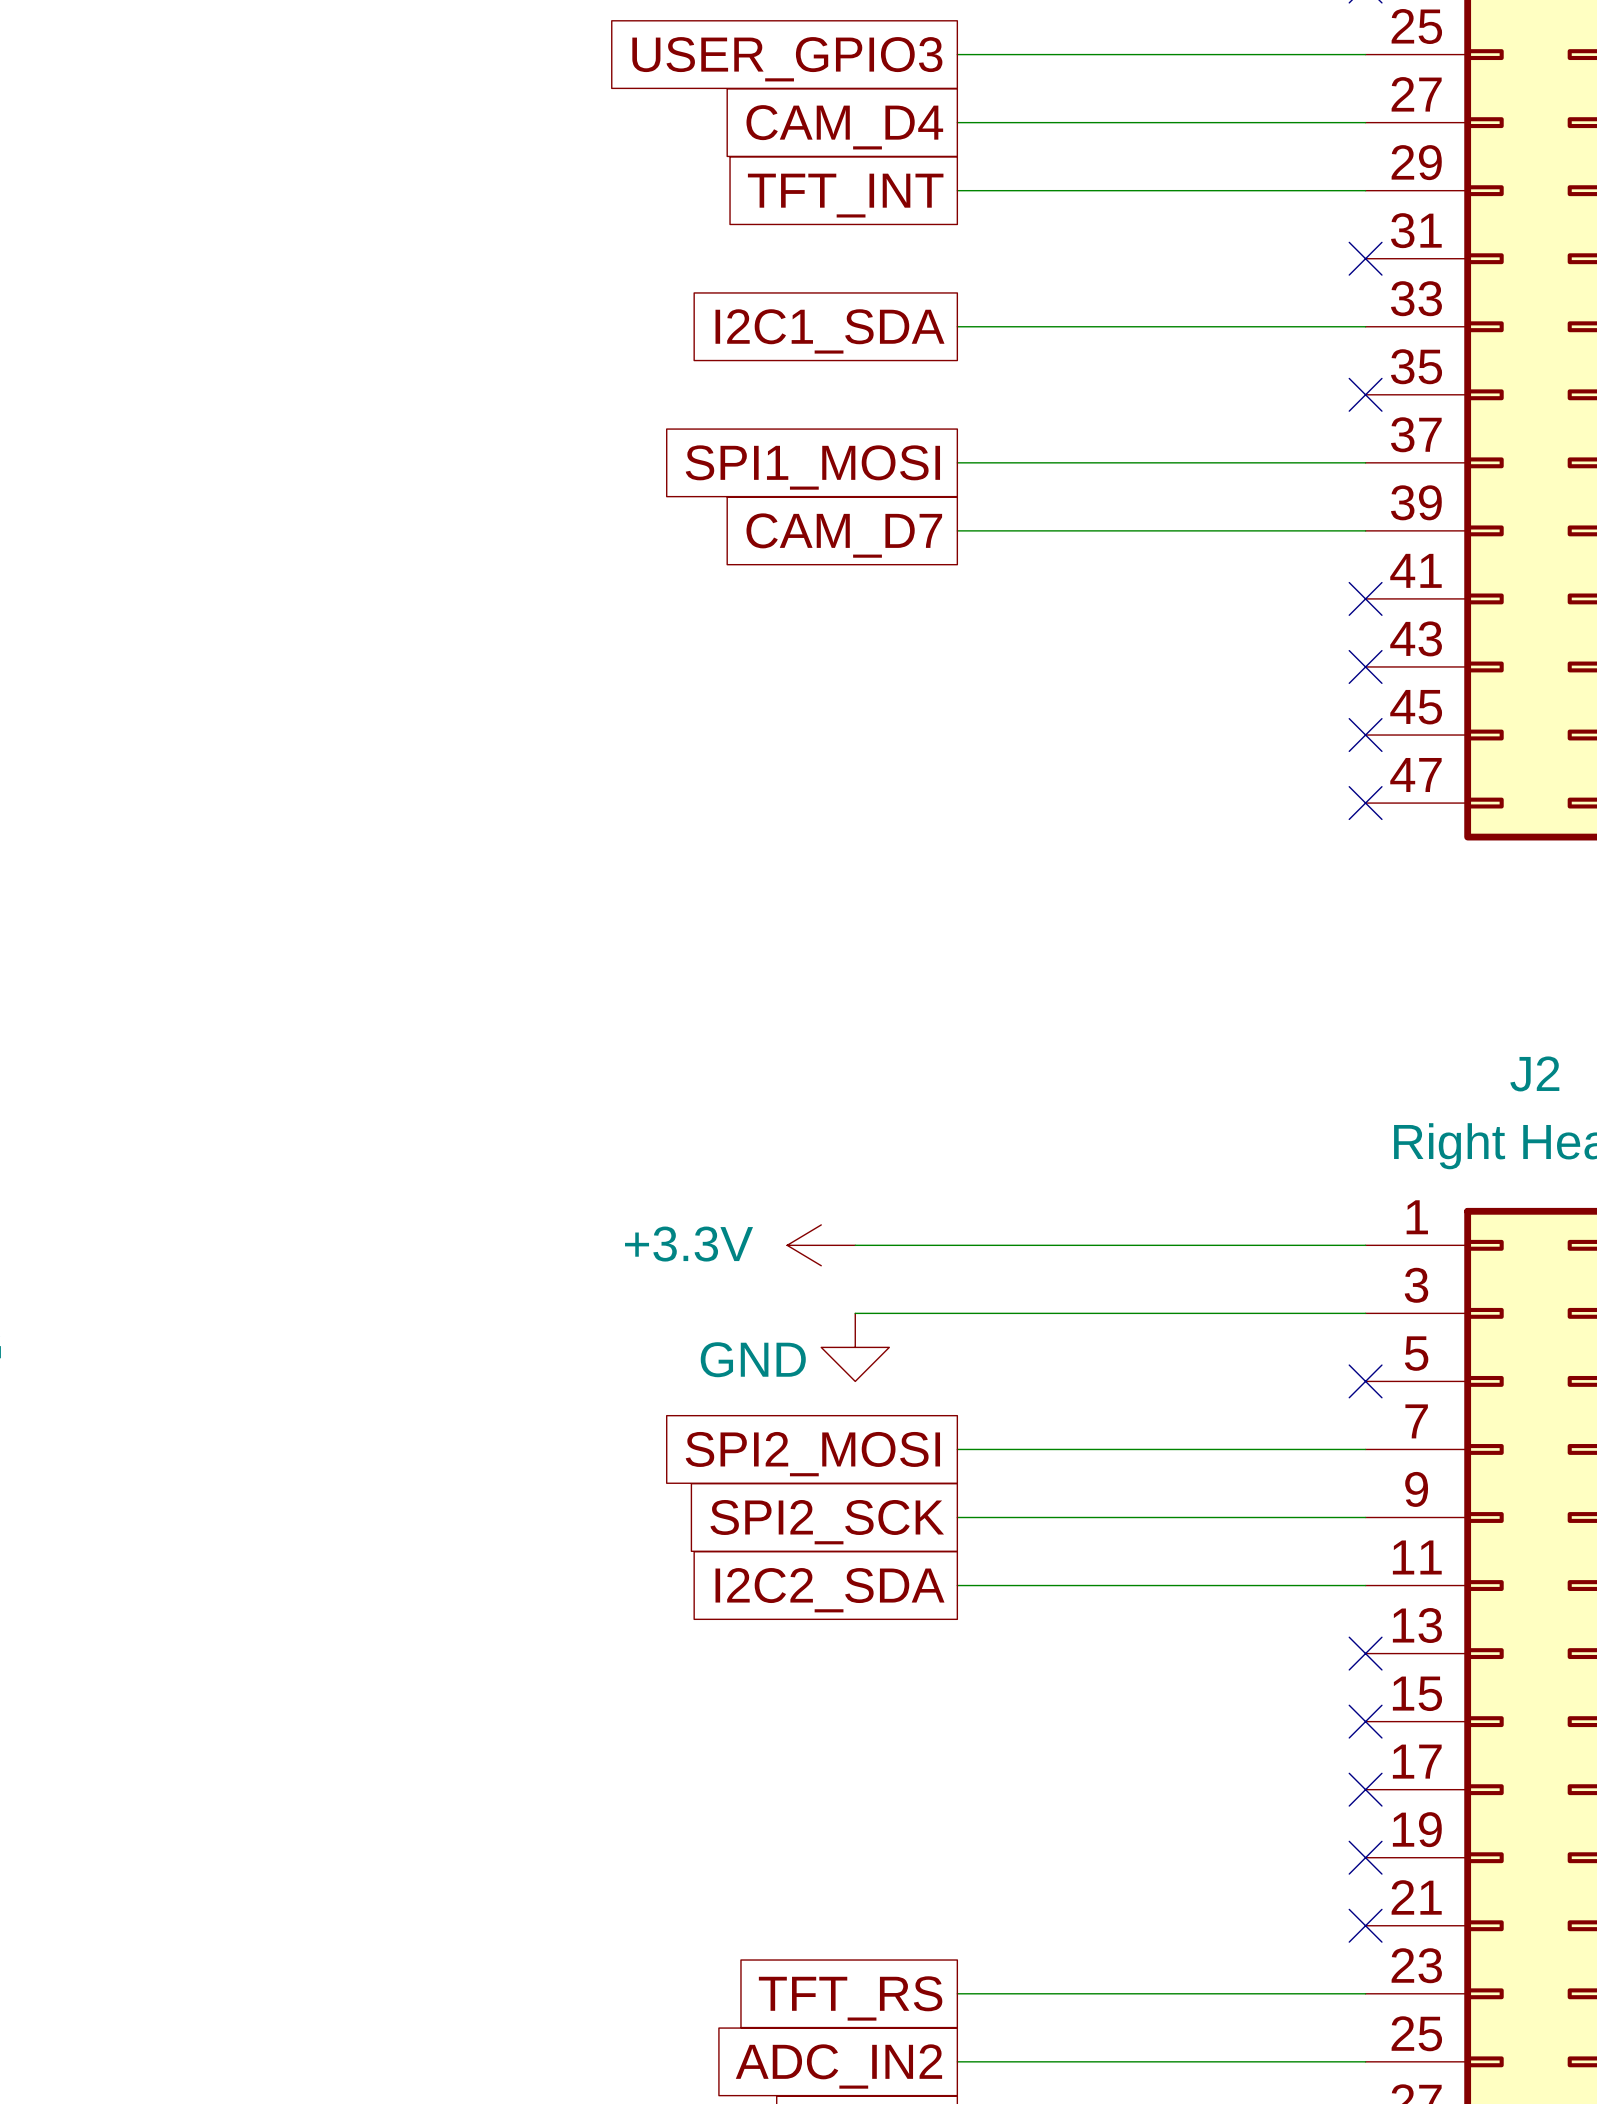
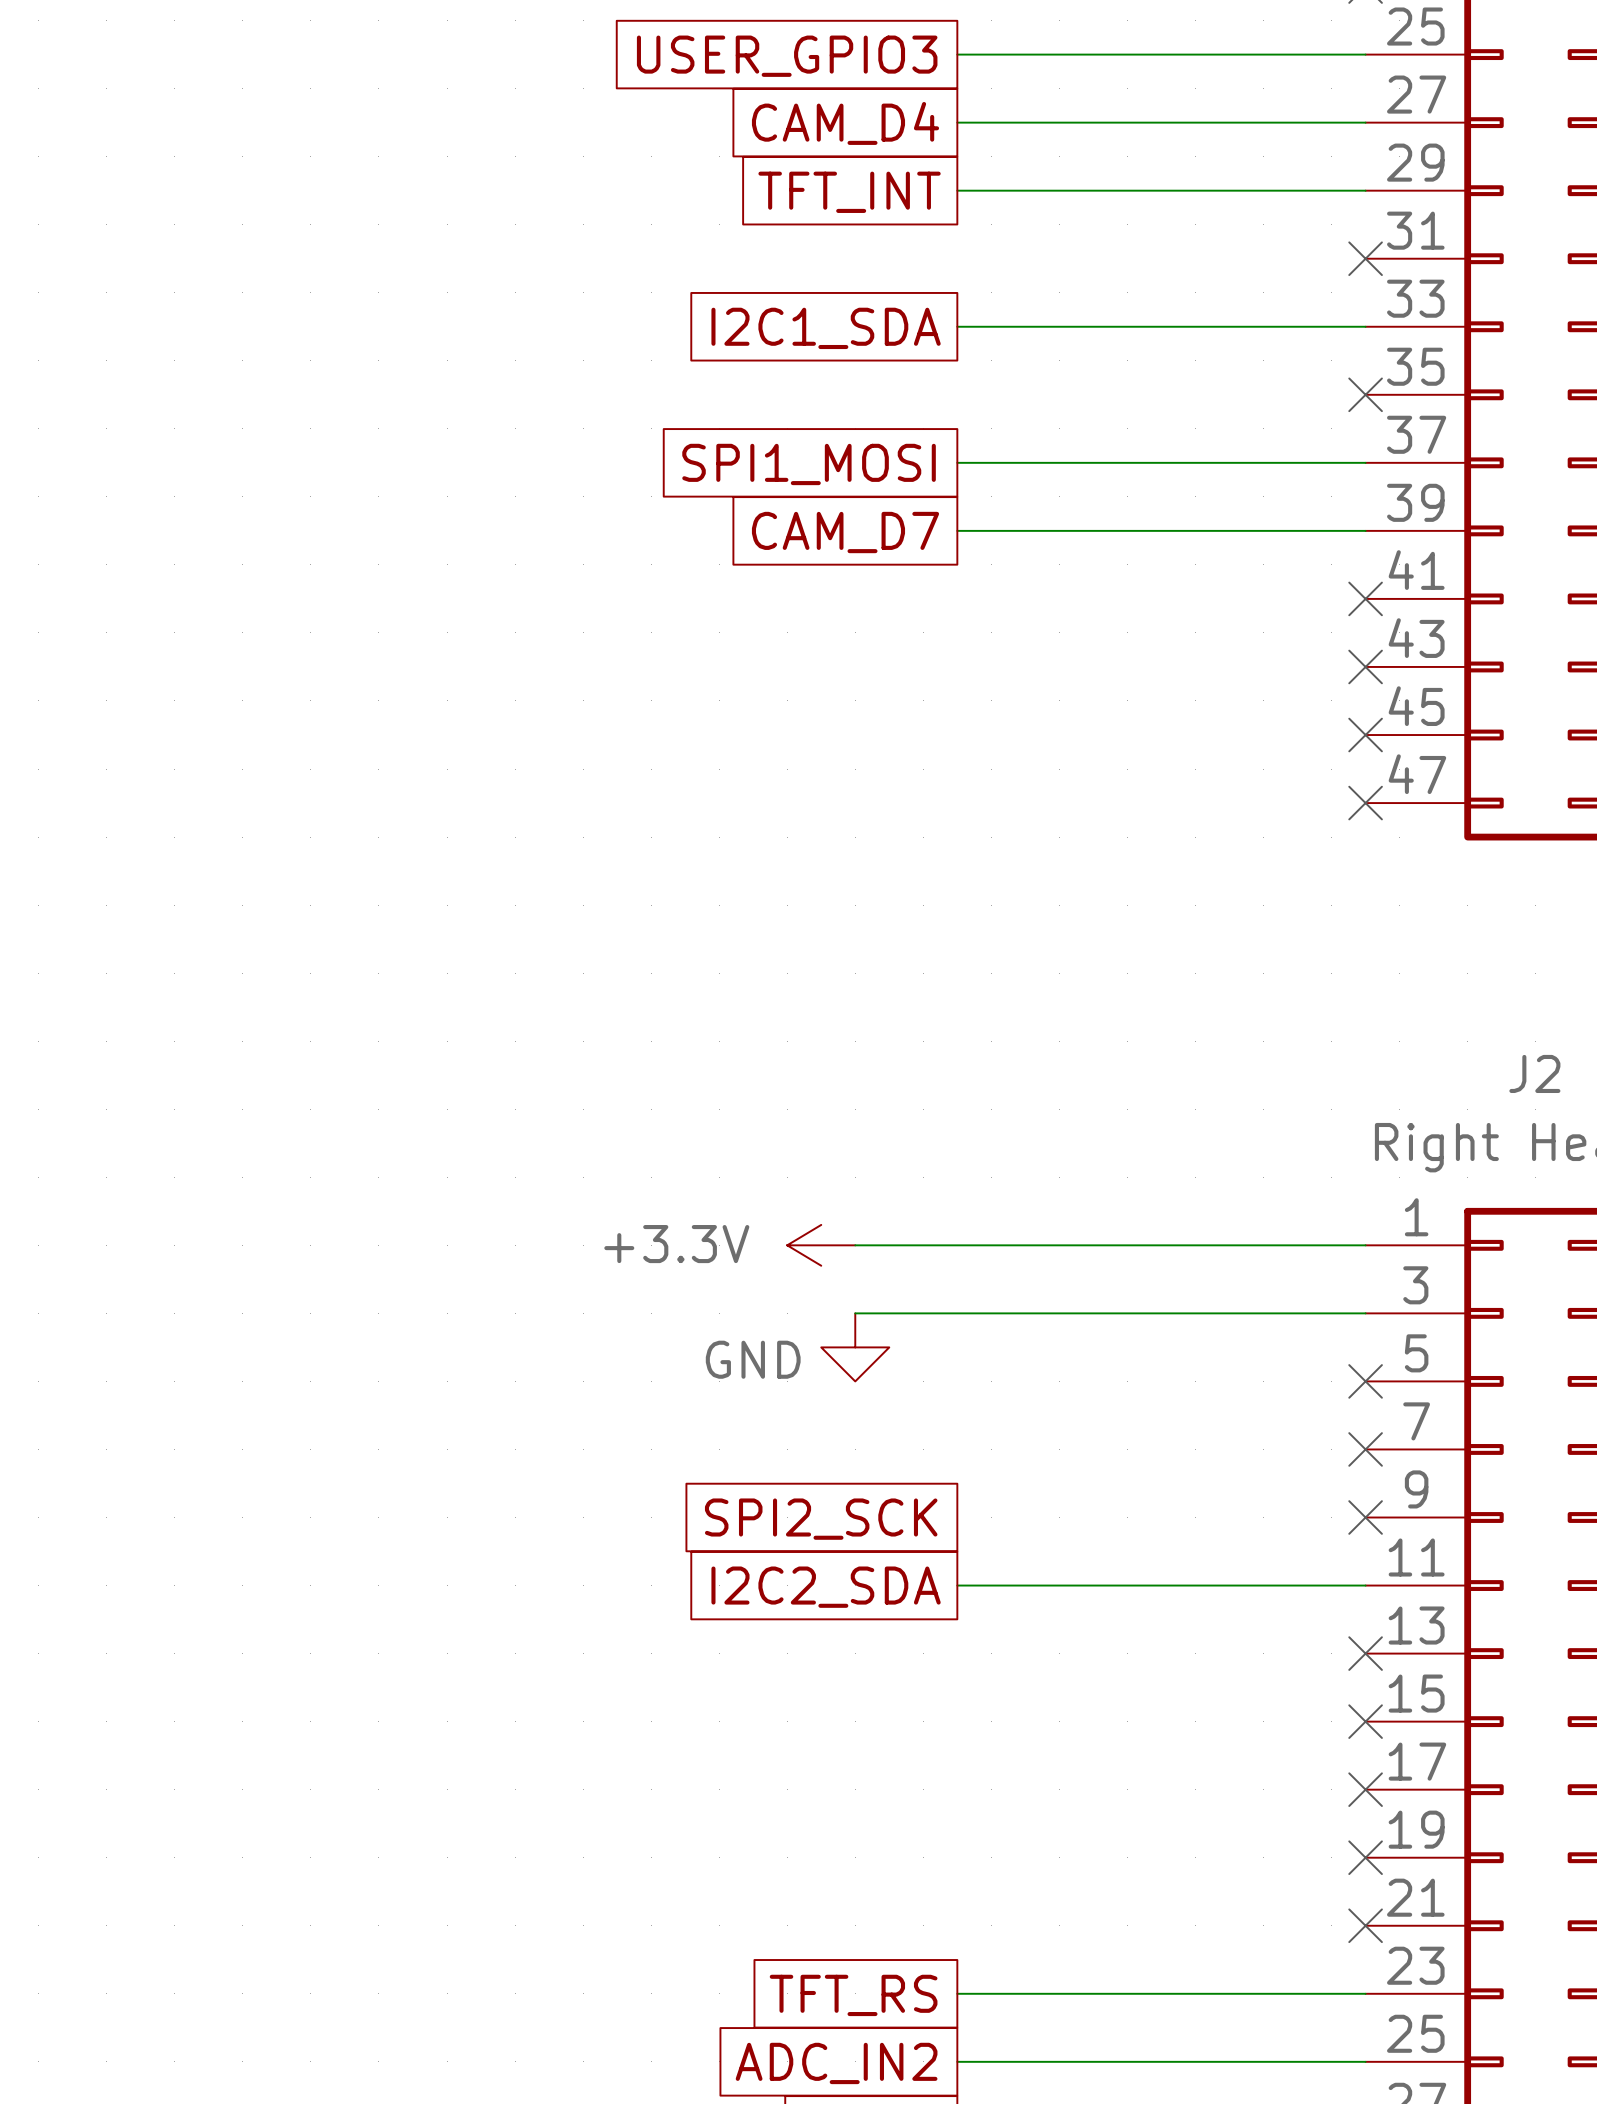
wire: (957, 1449) (1365, 1449) -> none
no-connect mark: none -> (1365, 1449)
global label: SPI2_MOSI (812, 1454) -> none
wire: (957, 1517) (1365, 1517) -> none
no-connect mark: none -> (1365, 1517)

